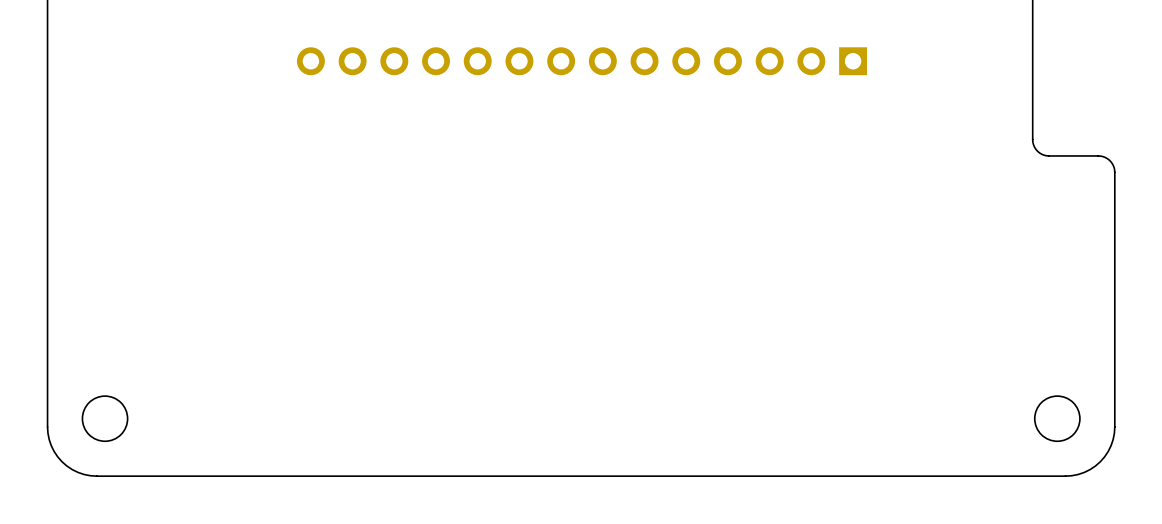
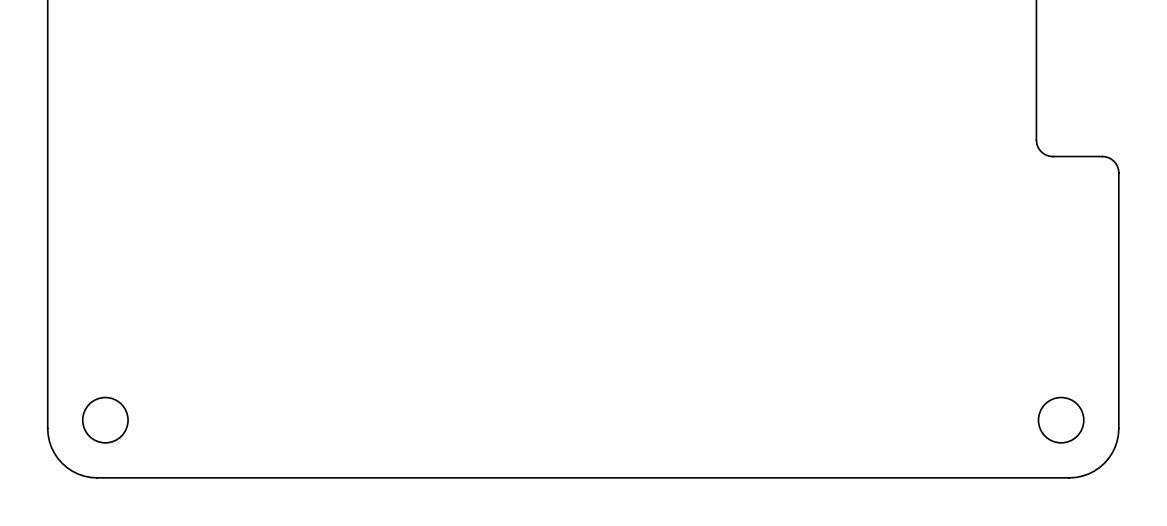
part: (581, 61) -> none

